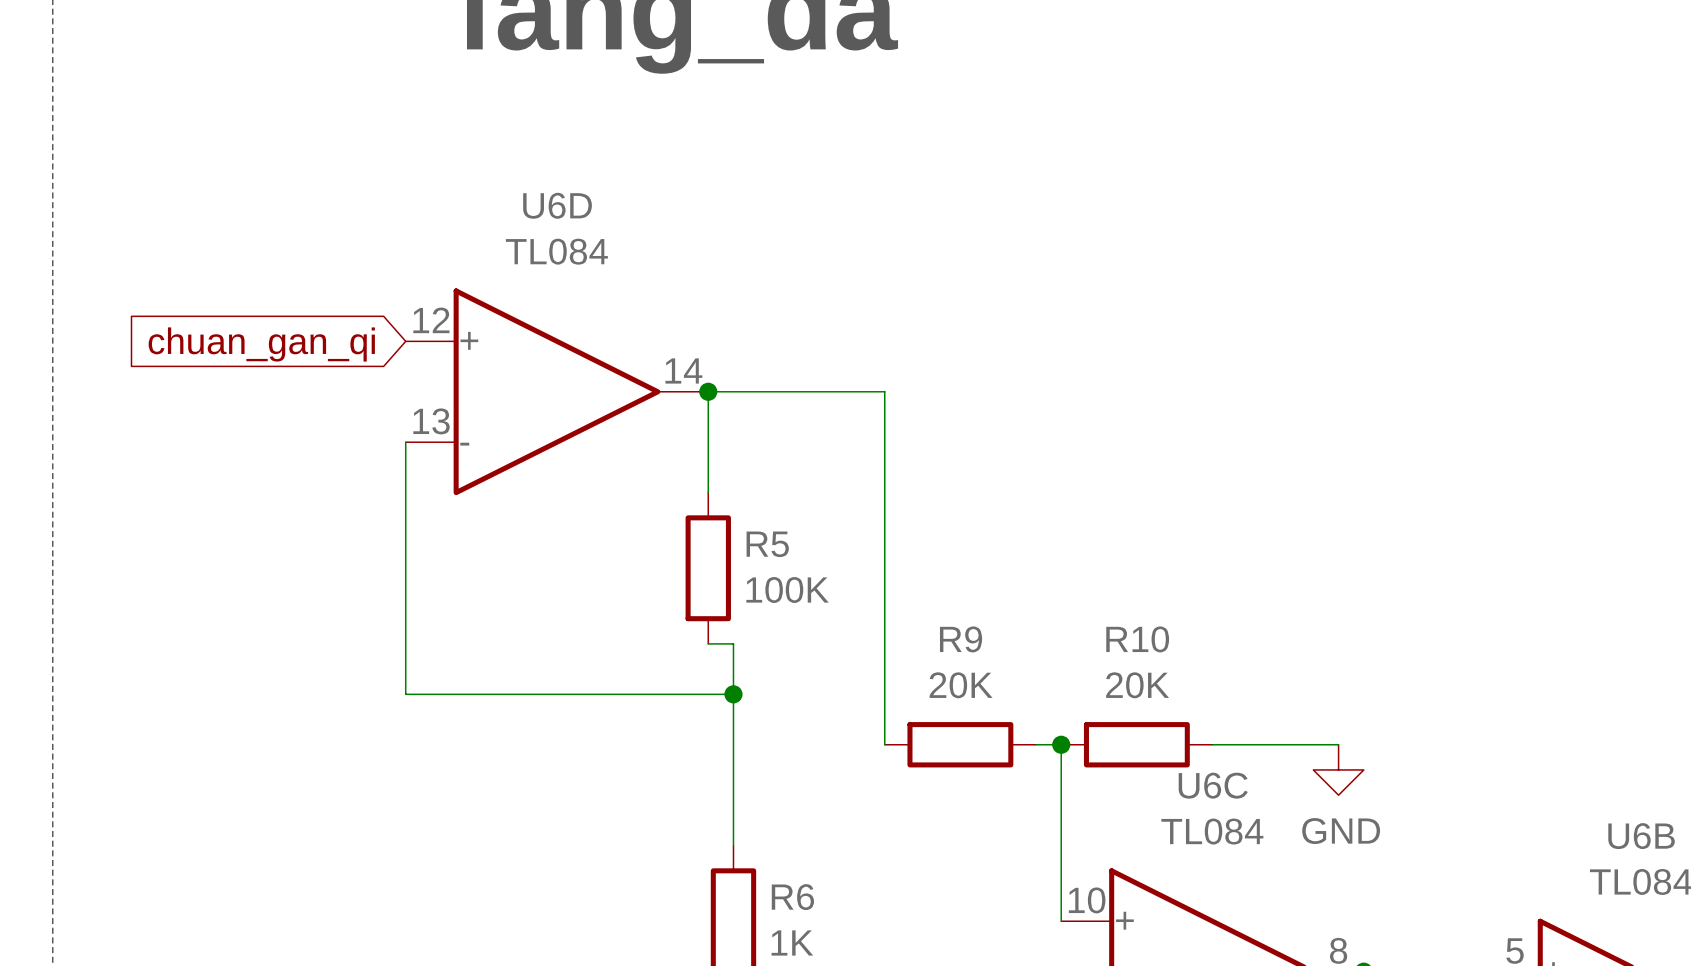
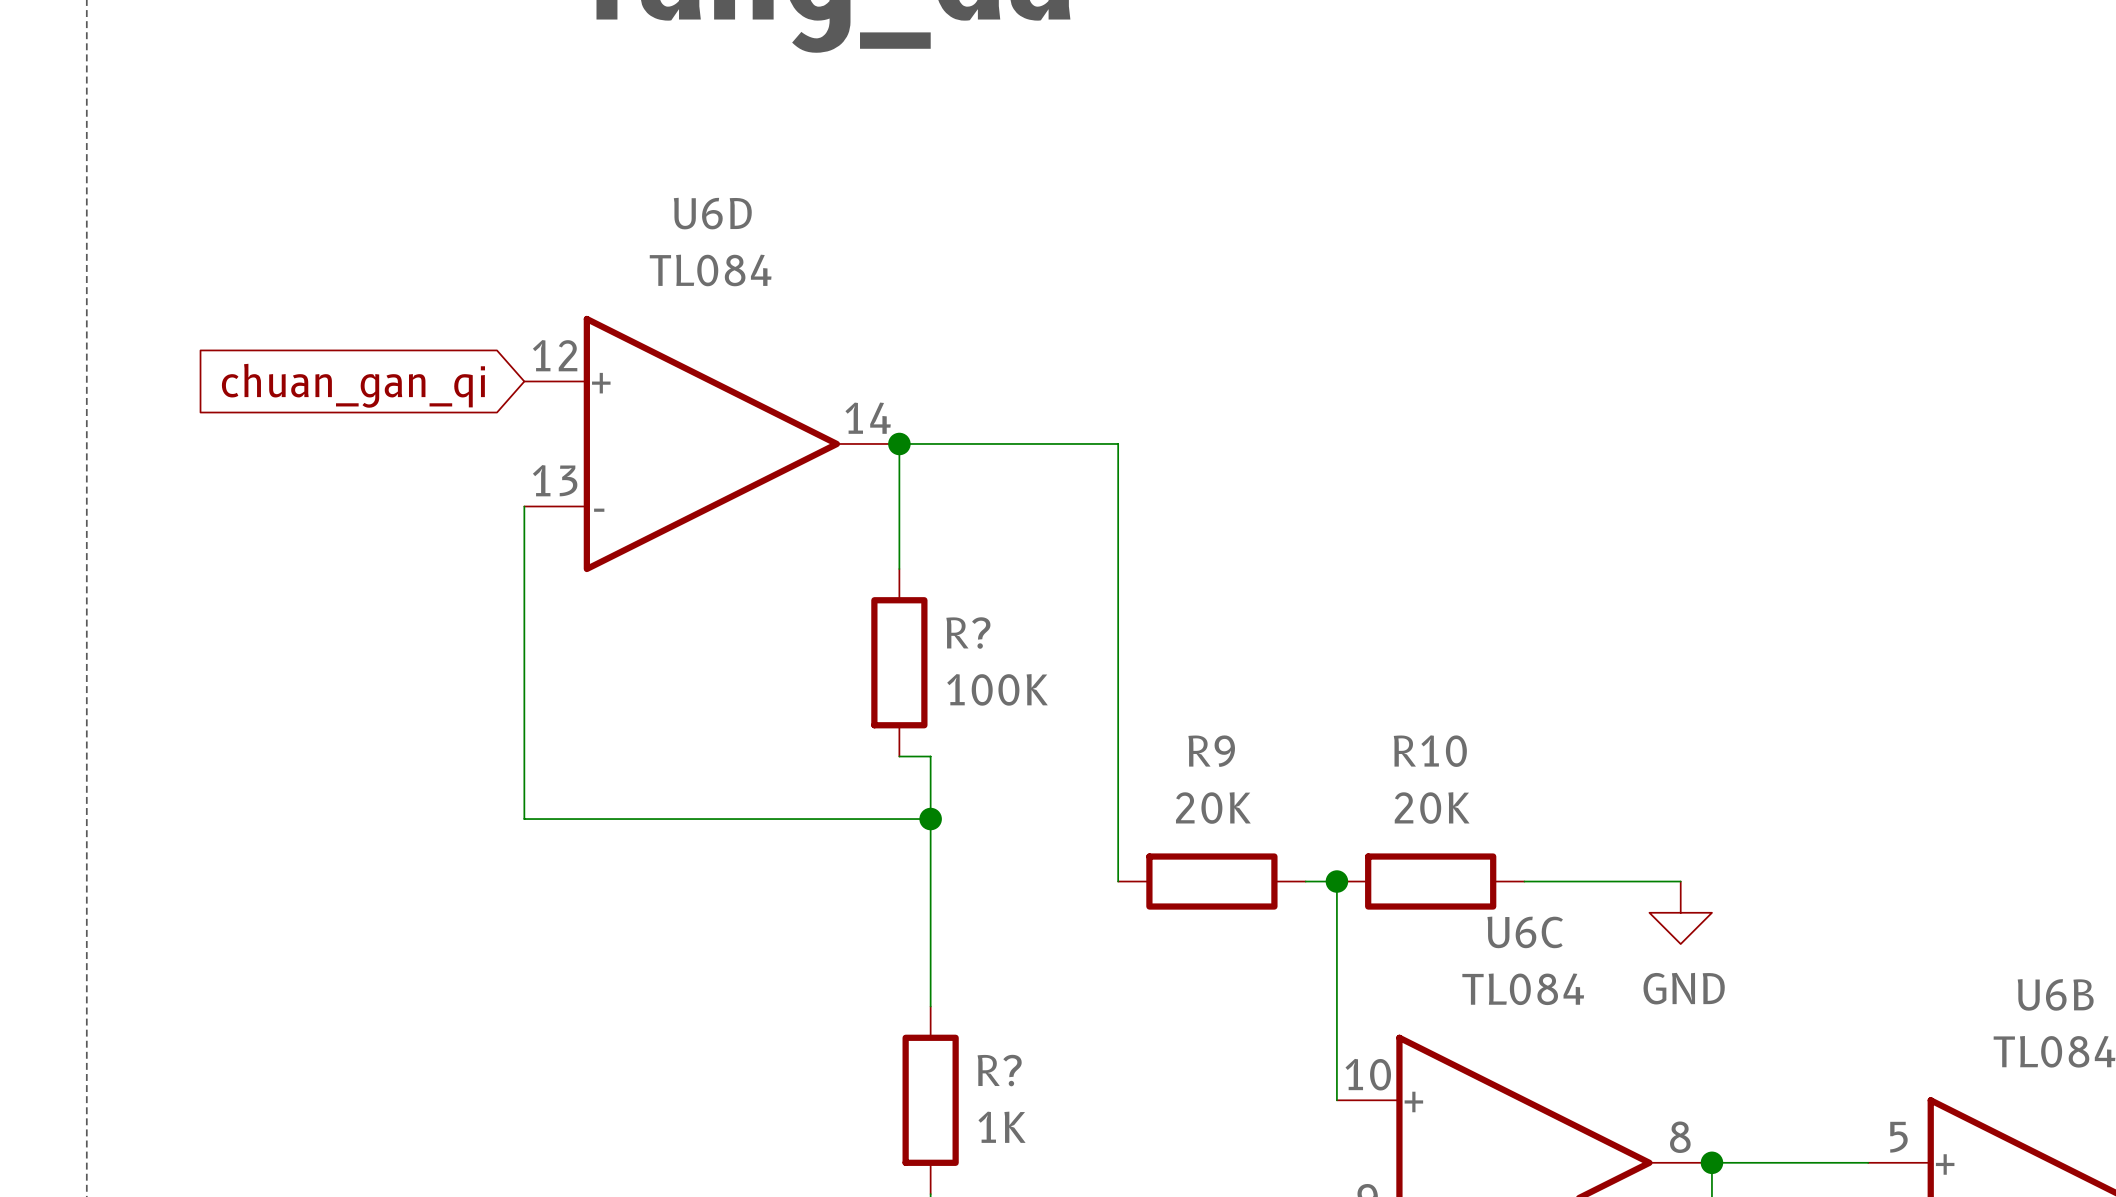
R5 name: R5 (767, 544) -> R? (968, 633)
R6 name: R6 (792, 897) -> R? (999, 1070)

